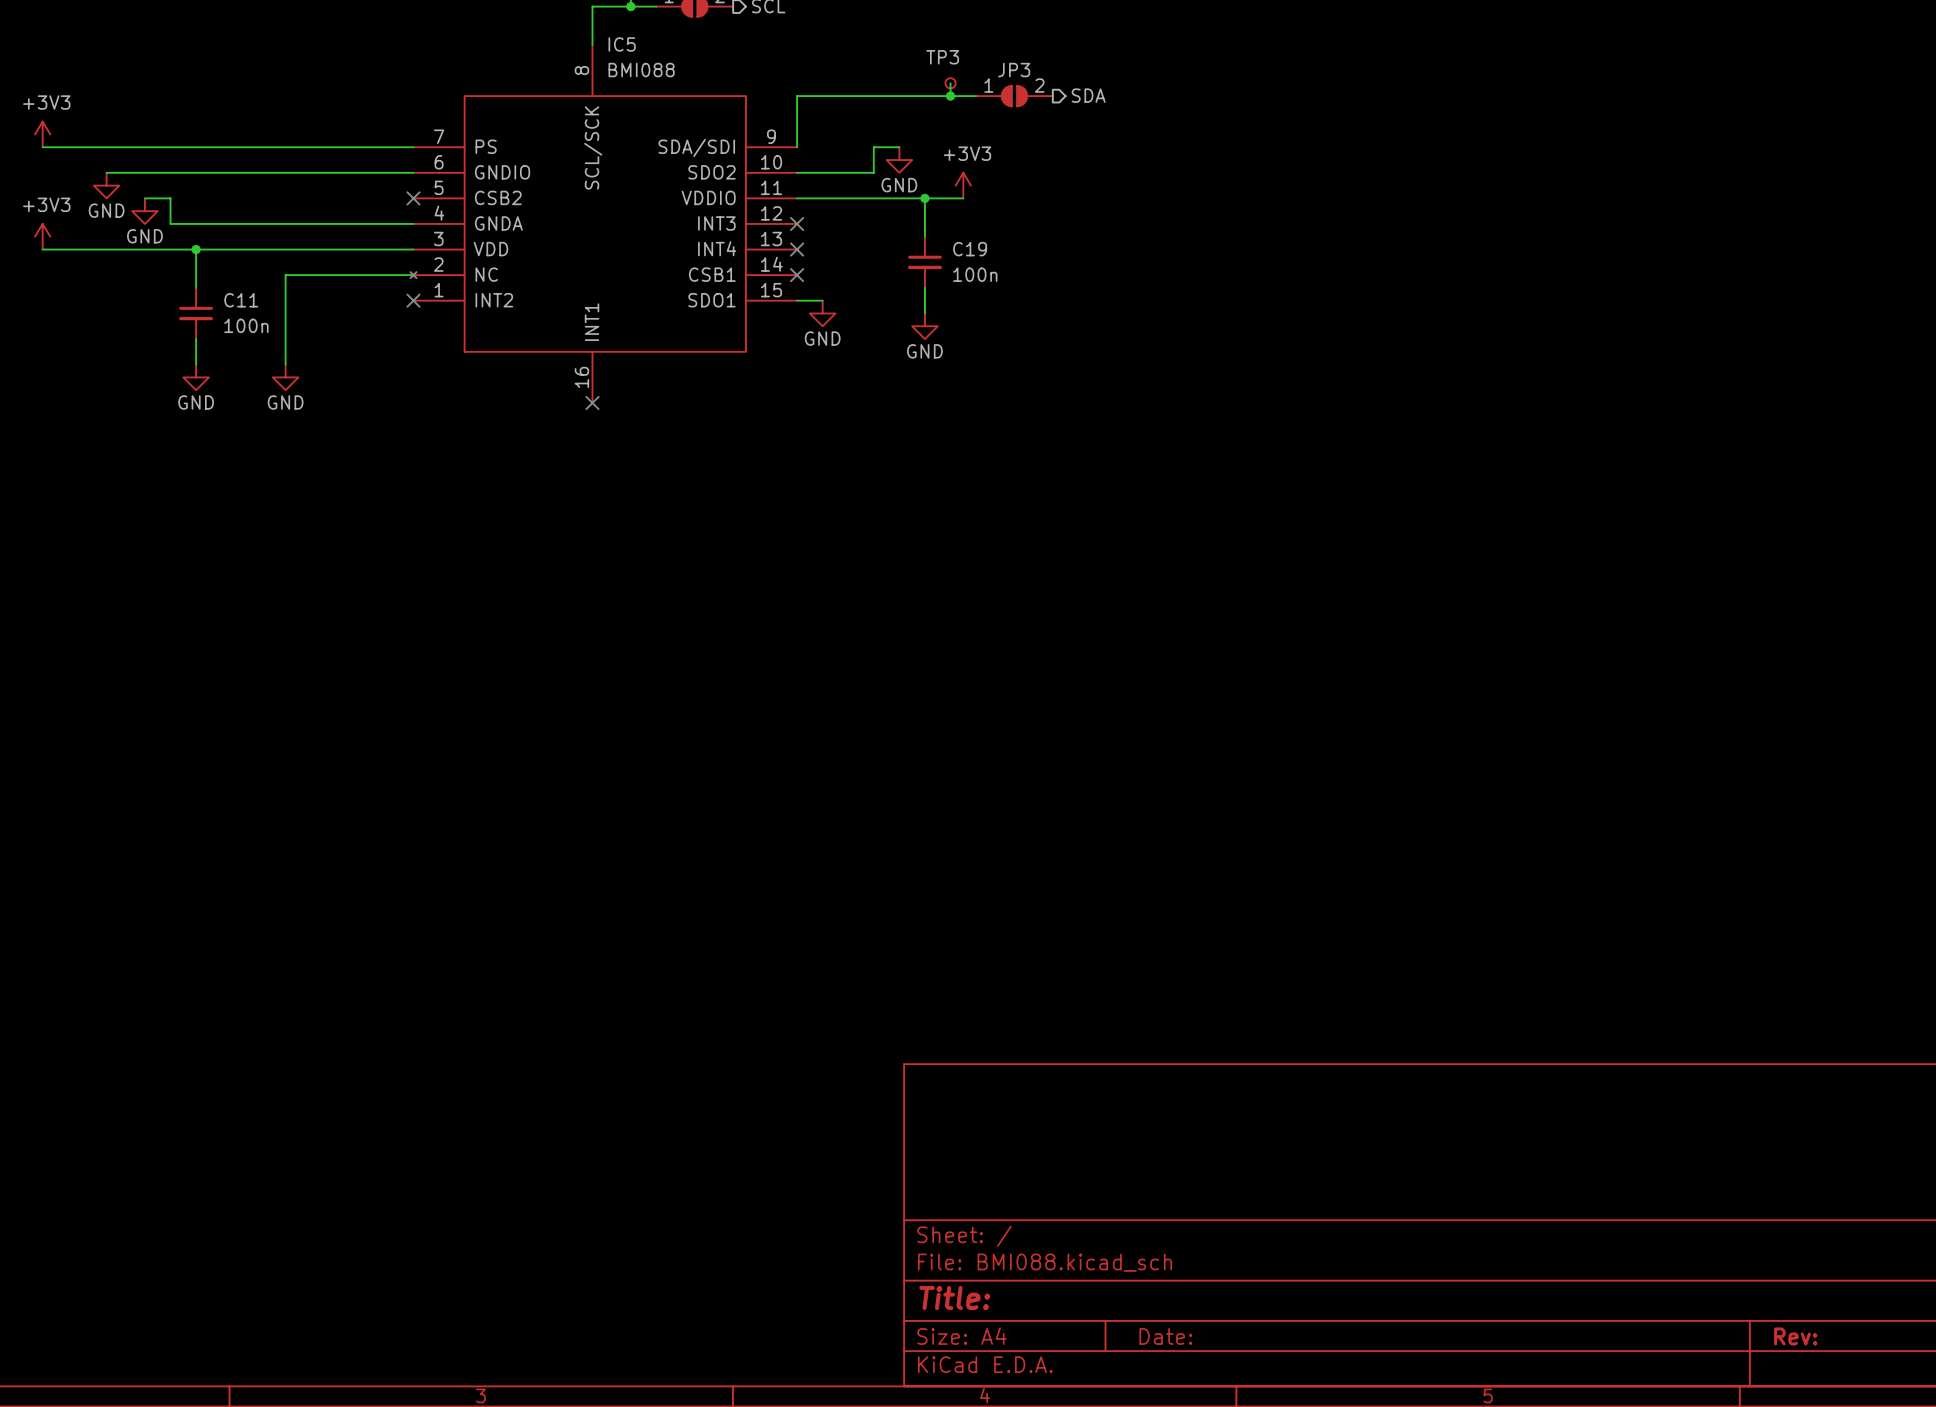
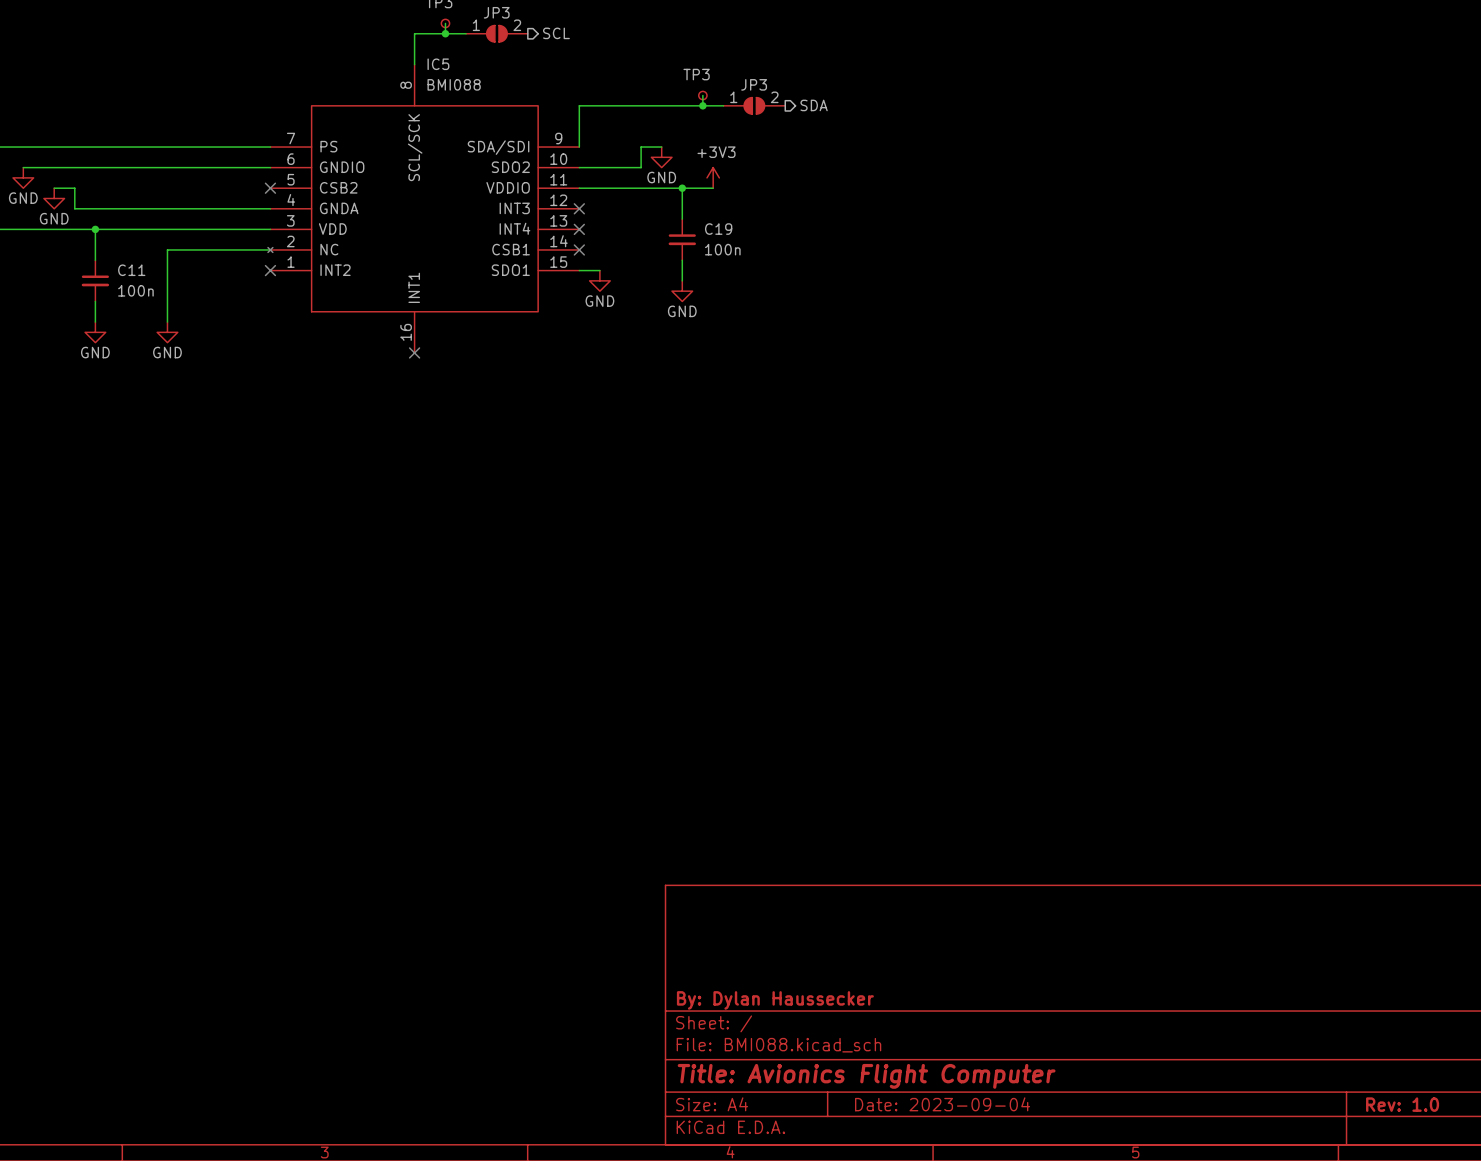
title block: none -> By: Dylan Haussecker (775, 1000)
title block: Title: (954, 1298) -> Title: Avionics Flight Computer (866, 1076)
title block: Date: (1165, 1336) -> Date: 2023-09-04 (942, 1104)
title block: Rev: (1795, 1336) -> Rev: 1.0 (1402, 1104)

